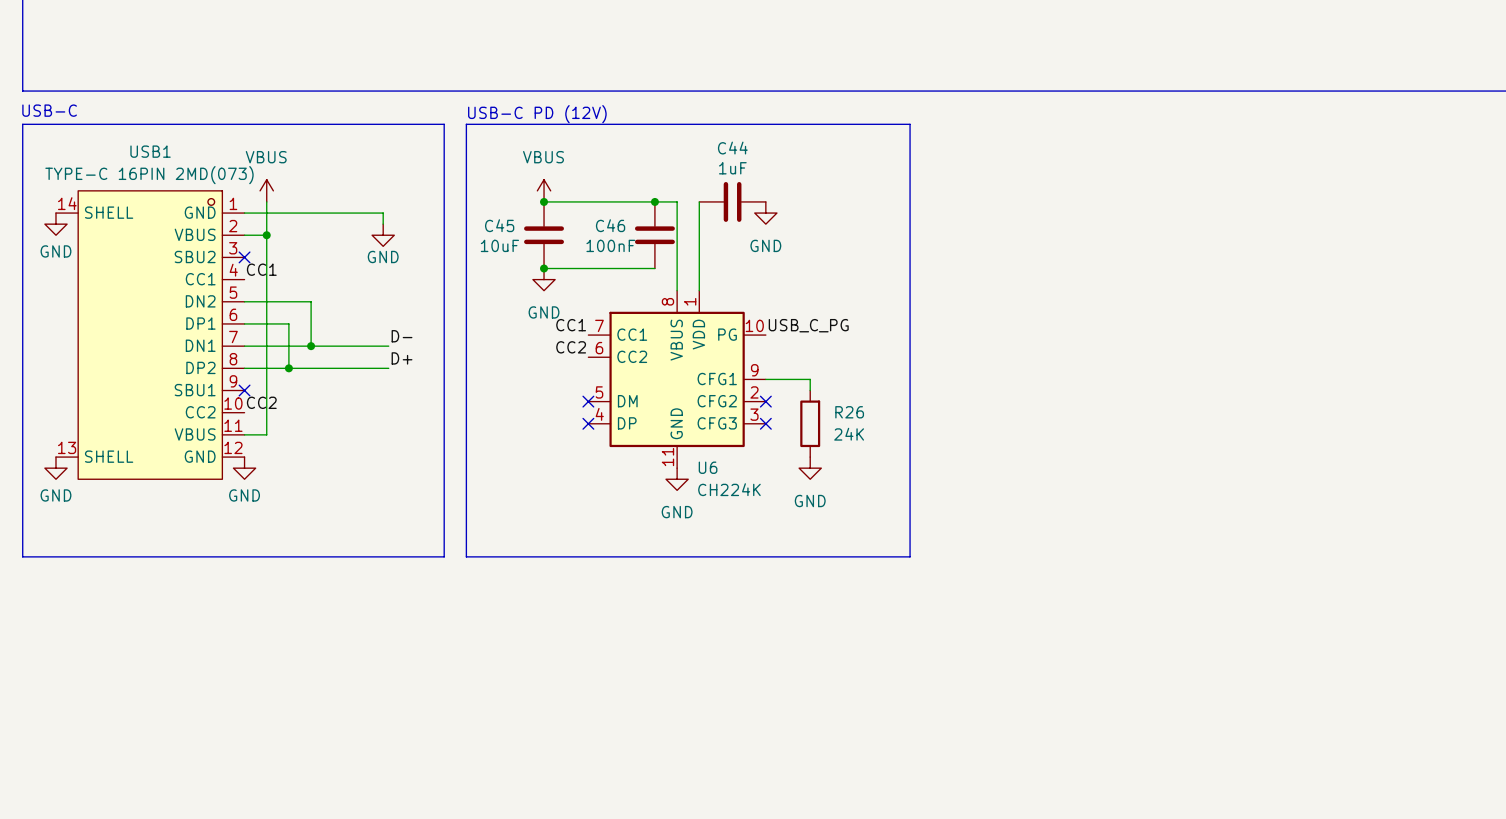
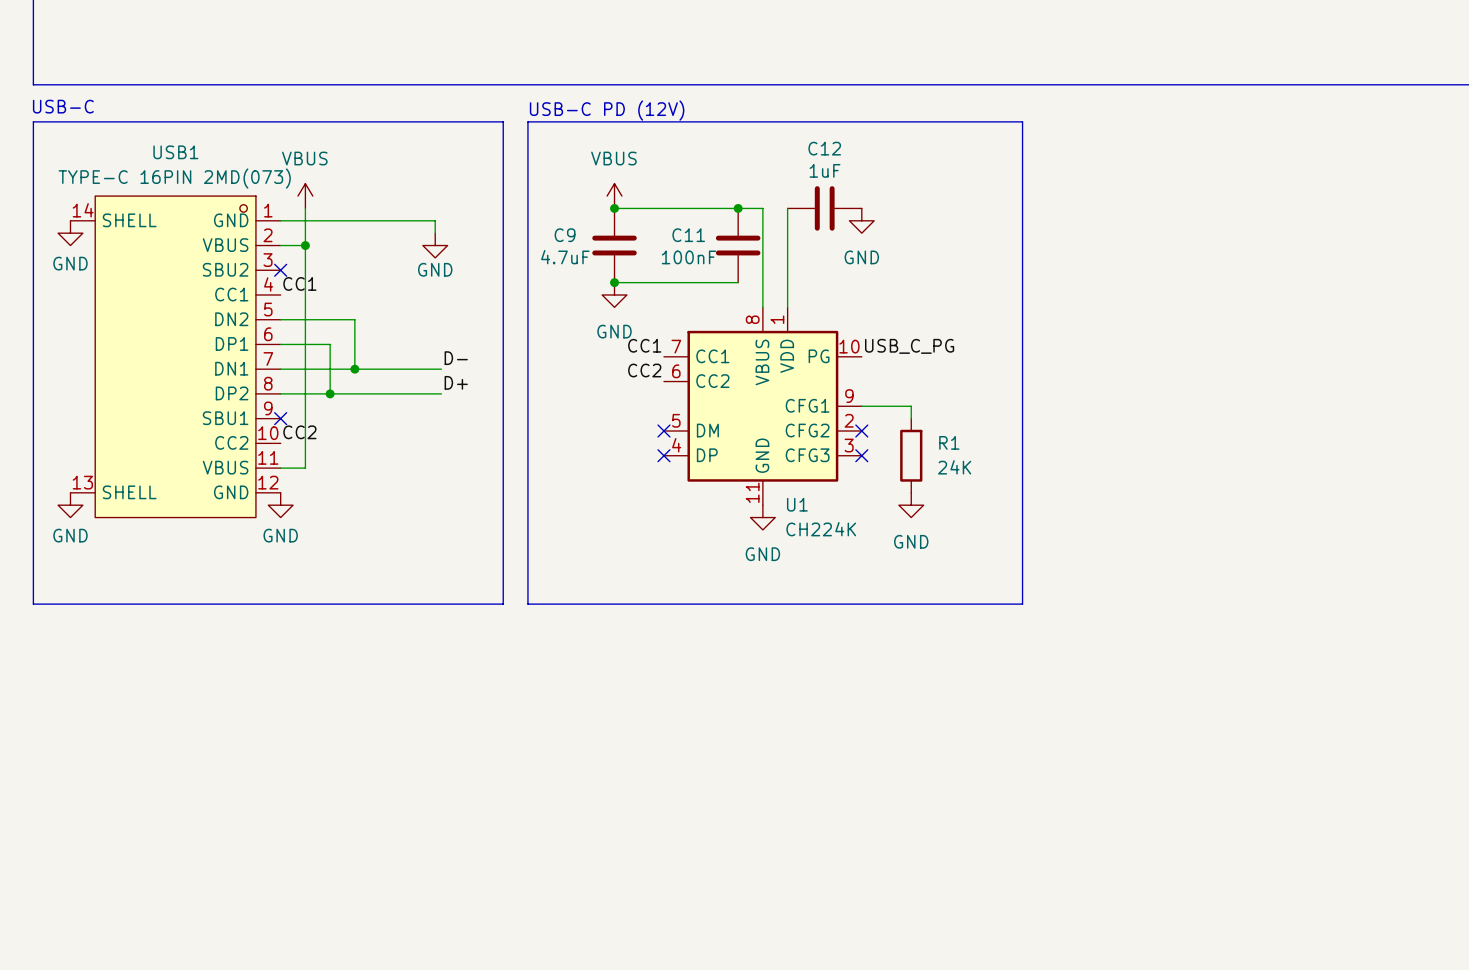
C44 name: C44 (732, 148) -> C12 (824, 148)
C45 name: C45 (499, 225) -> C9 (565, 235)
C46 name: C46 (610, 225) -> C11 (688, 235)
C45 value: 10uF (499, 245) -> 4.7uF (565, 257)
R26 name: R26 (849, 412) -> R1 (949, 442)
U6 name: U6 (708, 467) -> U1 (797, 504)

